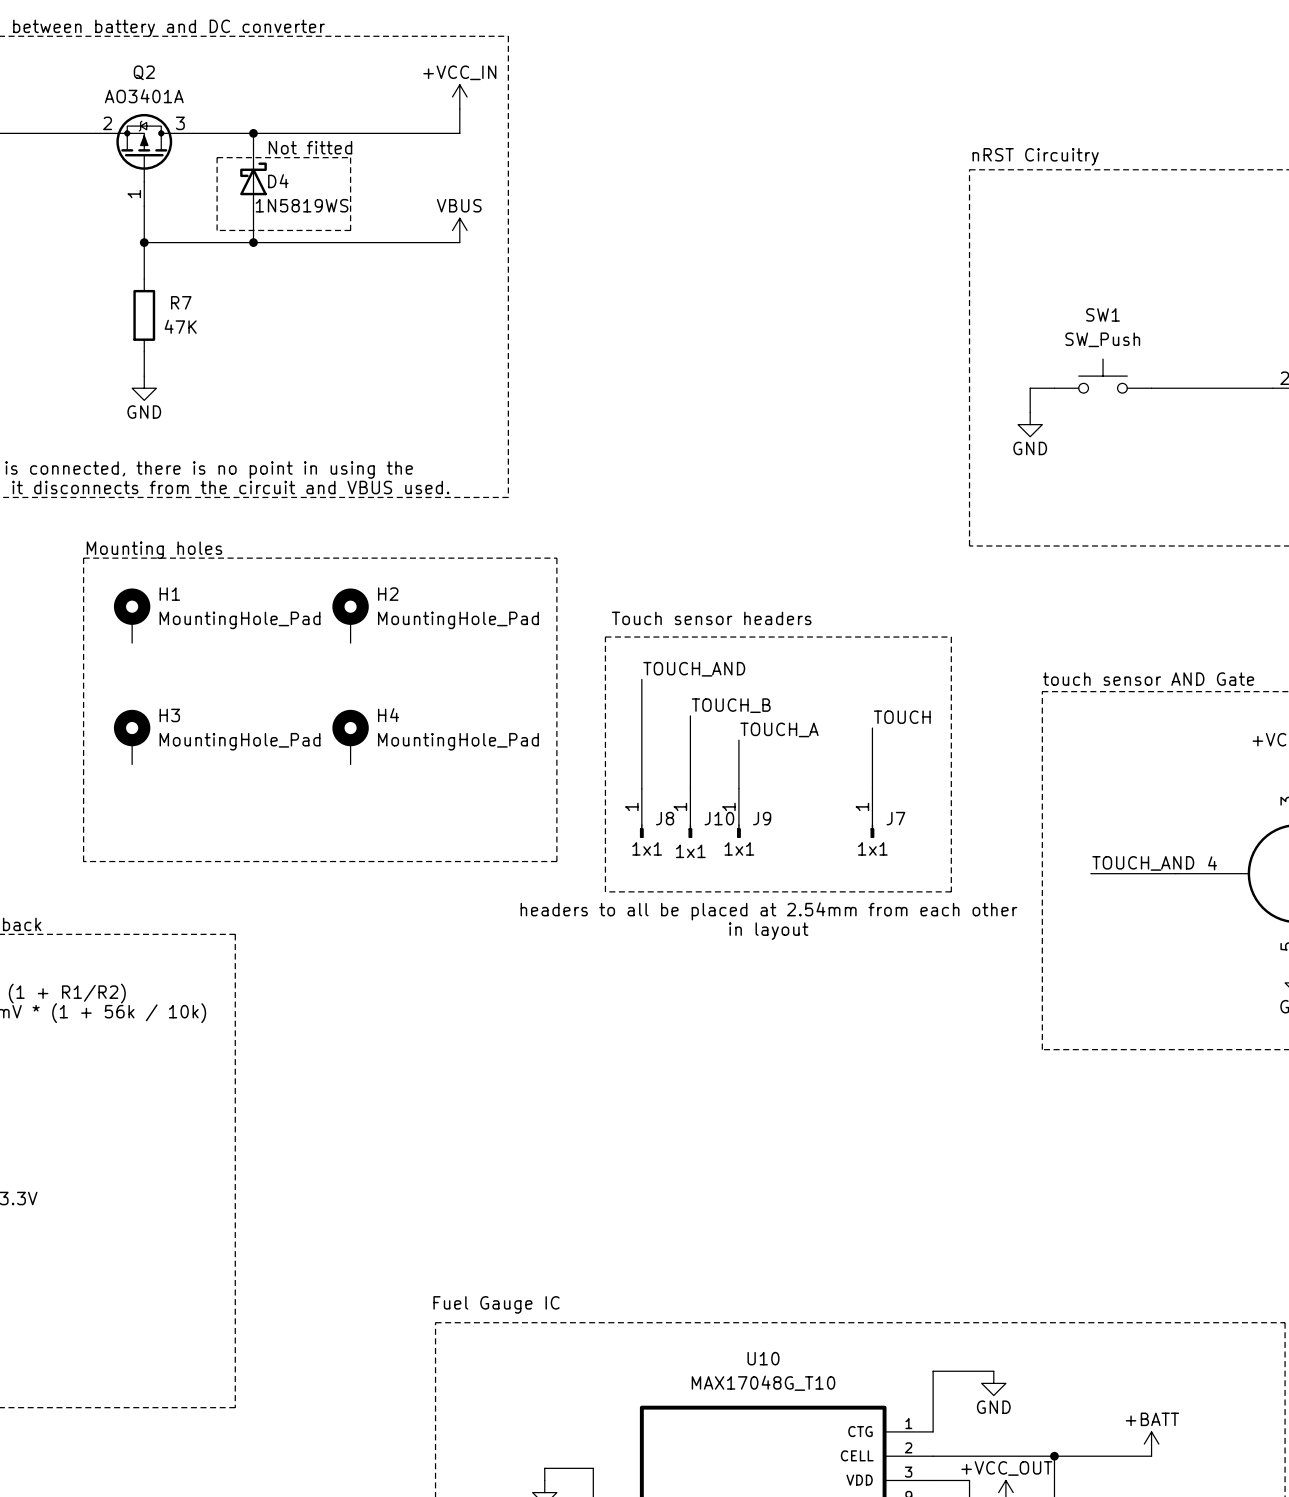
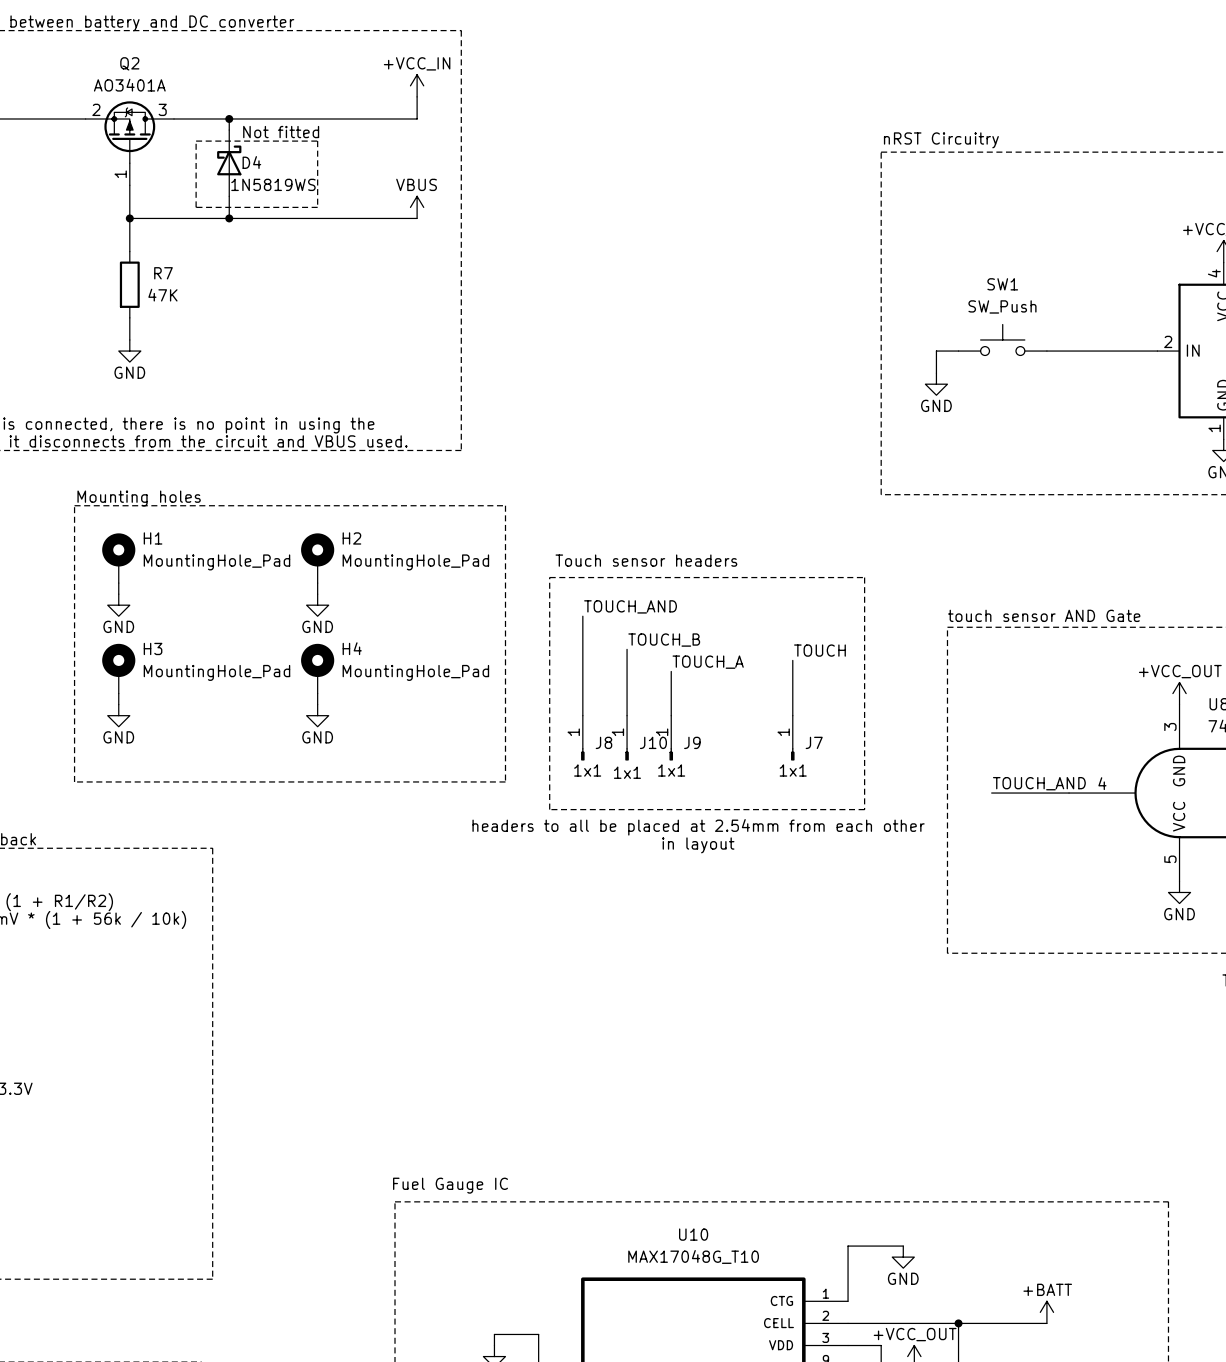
wire: none -> (118, 583) (118, 594)
wire: none -> (317, 583) (317, 594)
power symbol: none -> GND (118, 605)
power symbol: none -> GND (317, 605)
wire: none -> (118, 693) (118, 704)
wire: none -> (317, 693) (317, 704)
power symbol: none -> GND (118, 715)
power symbol: none -> GND (317, 715)

